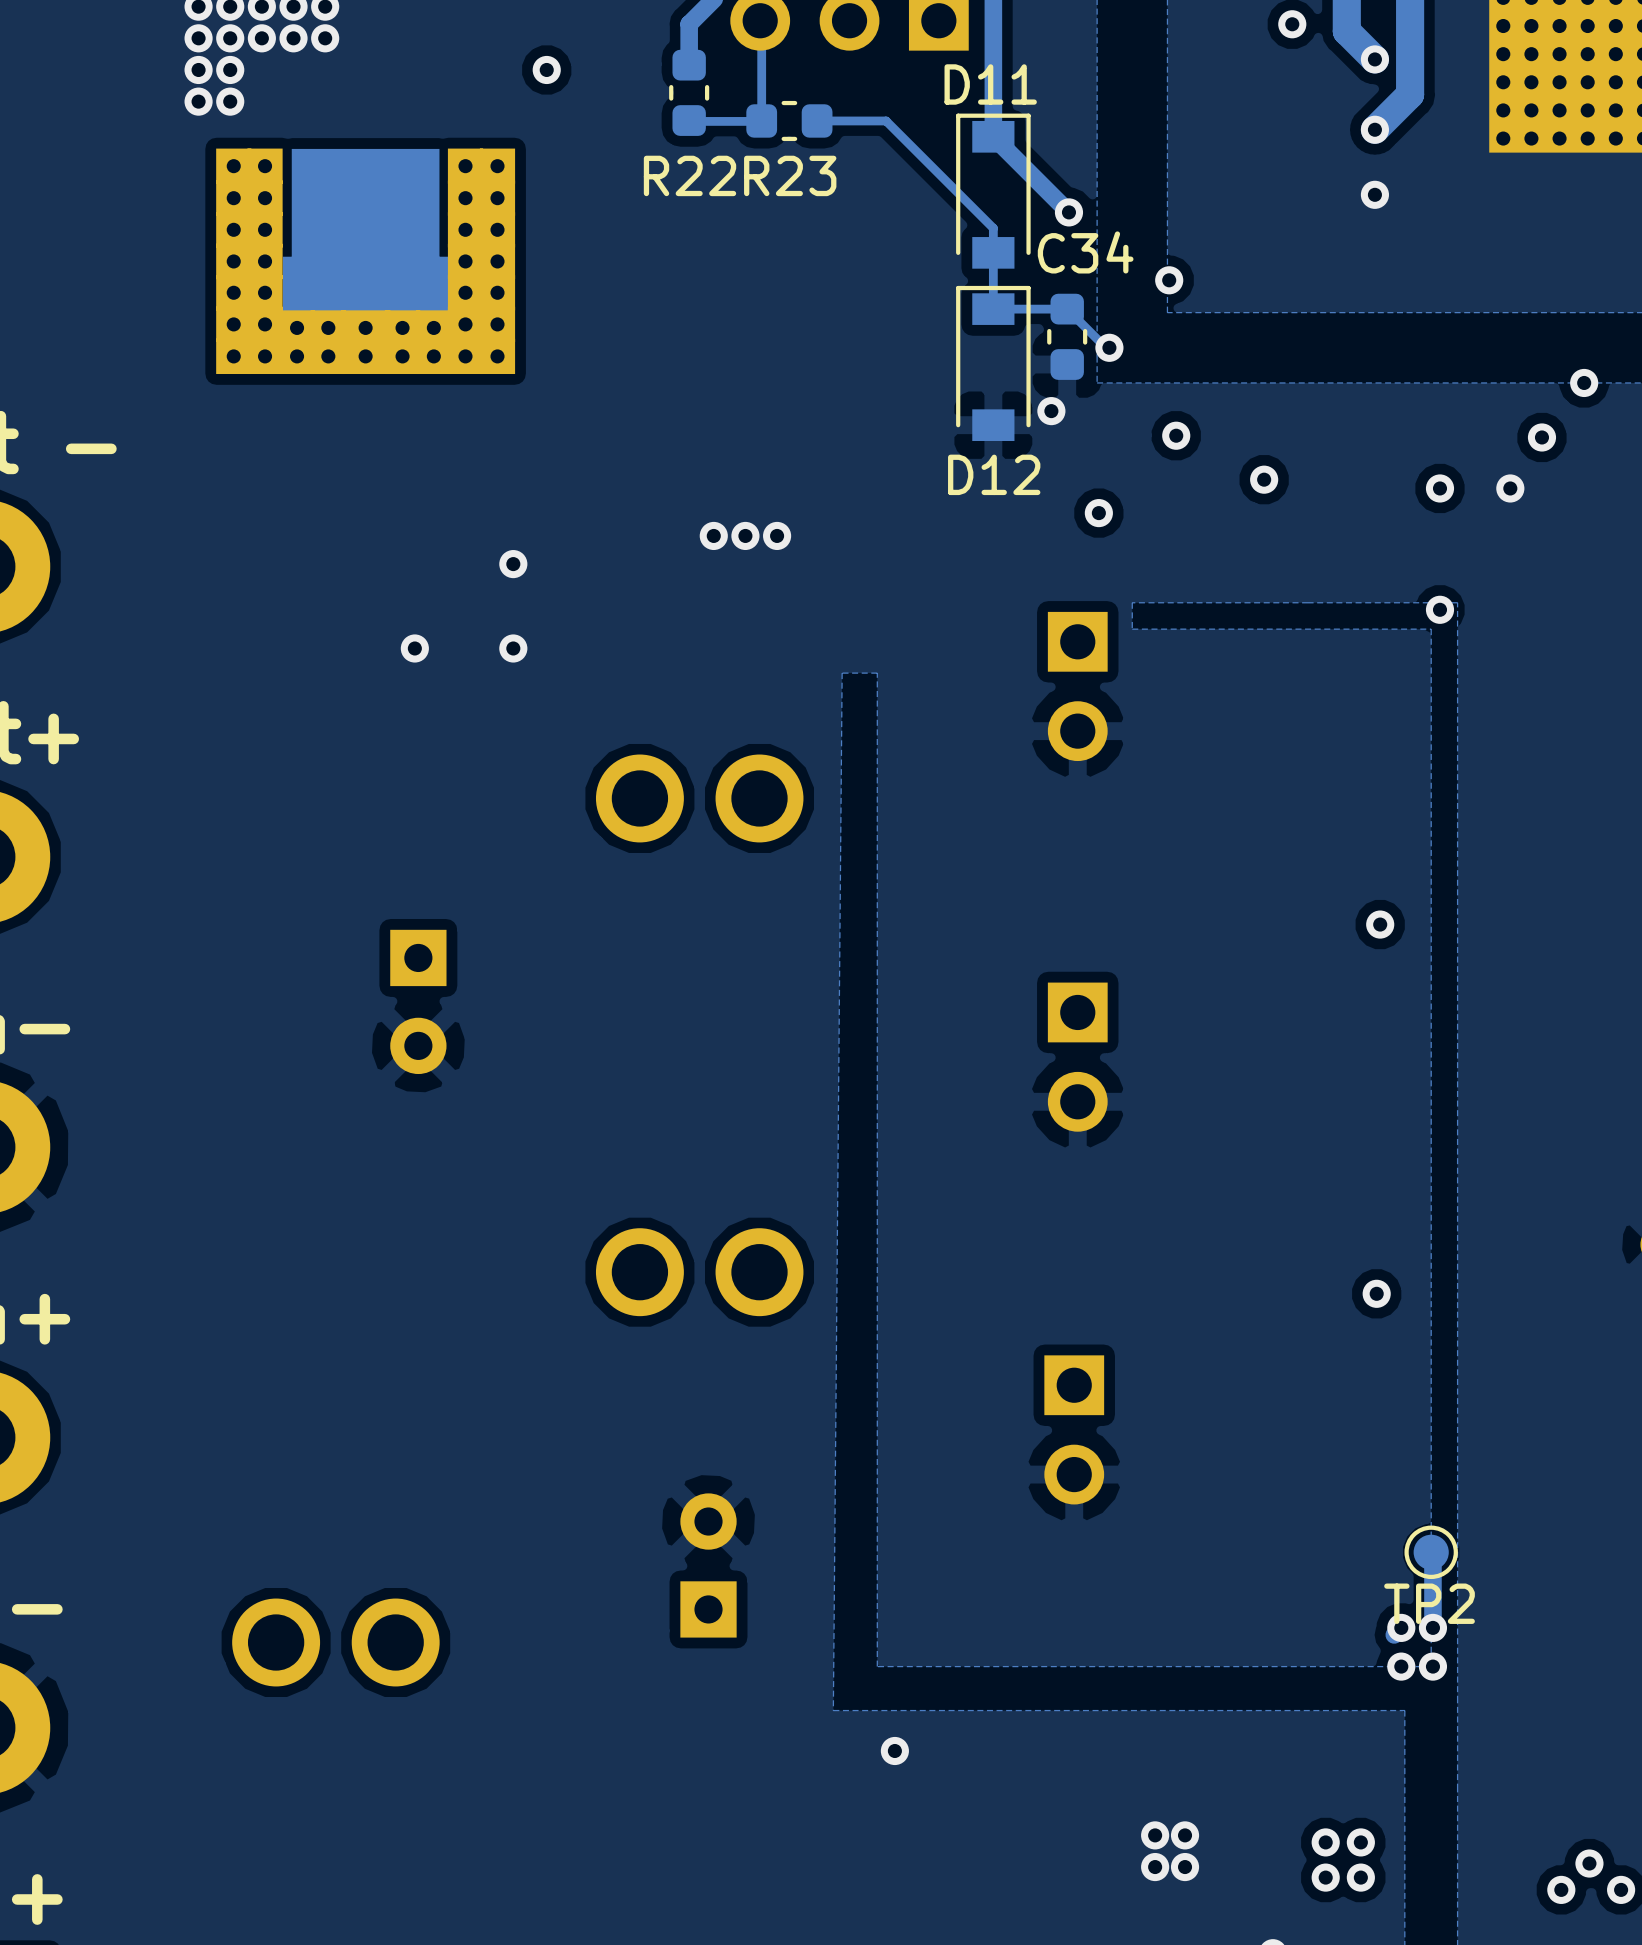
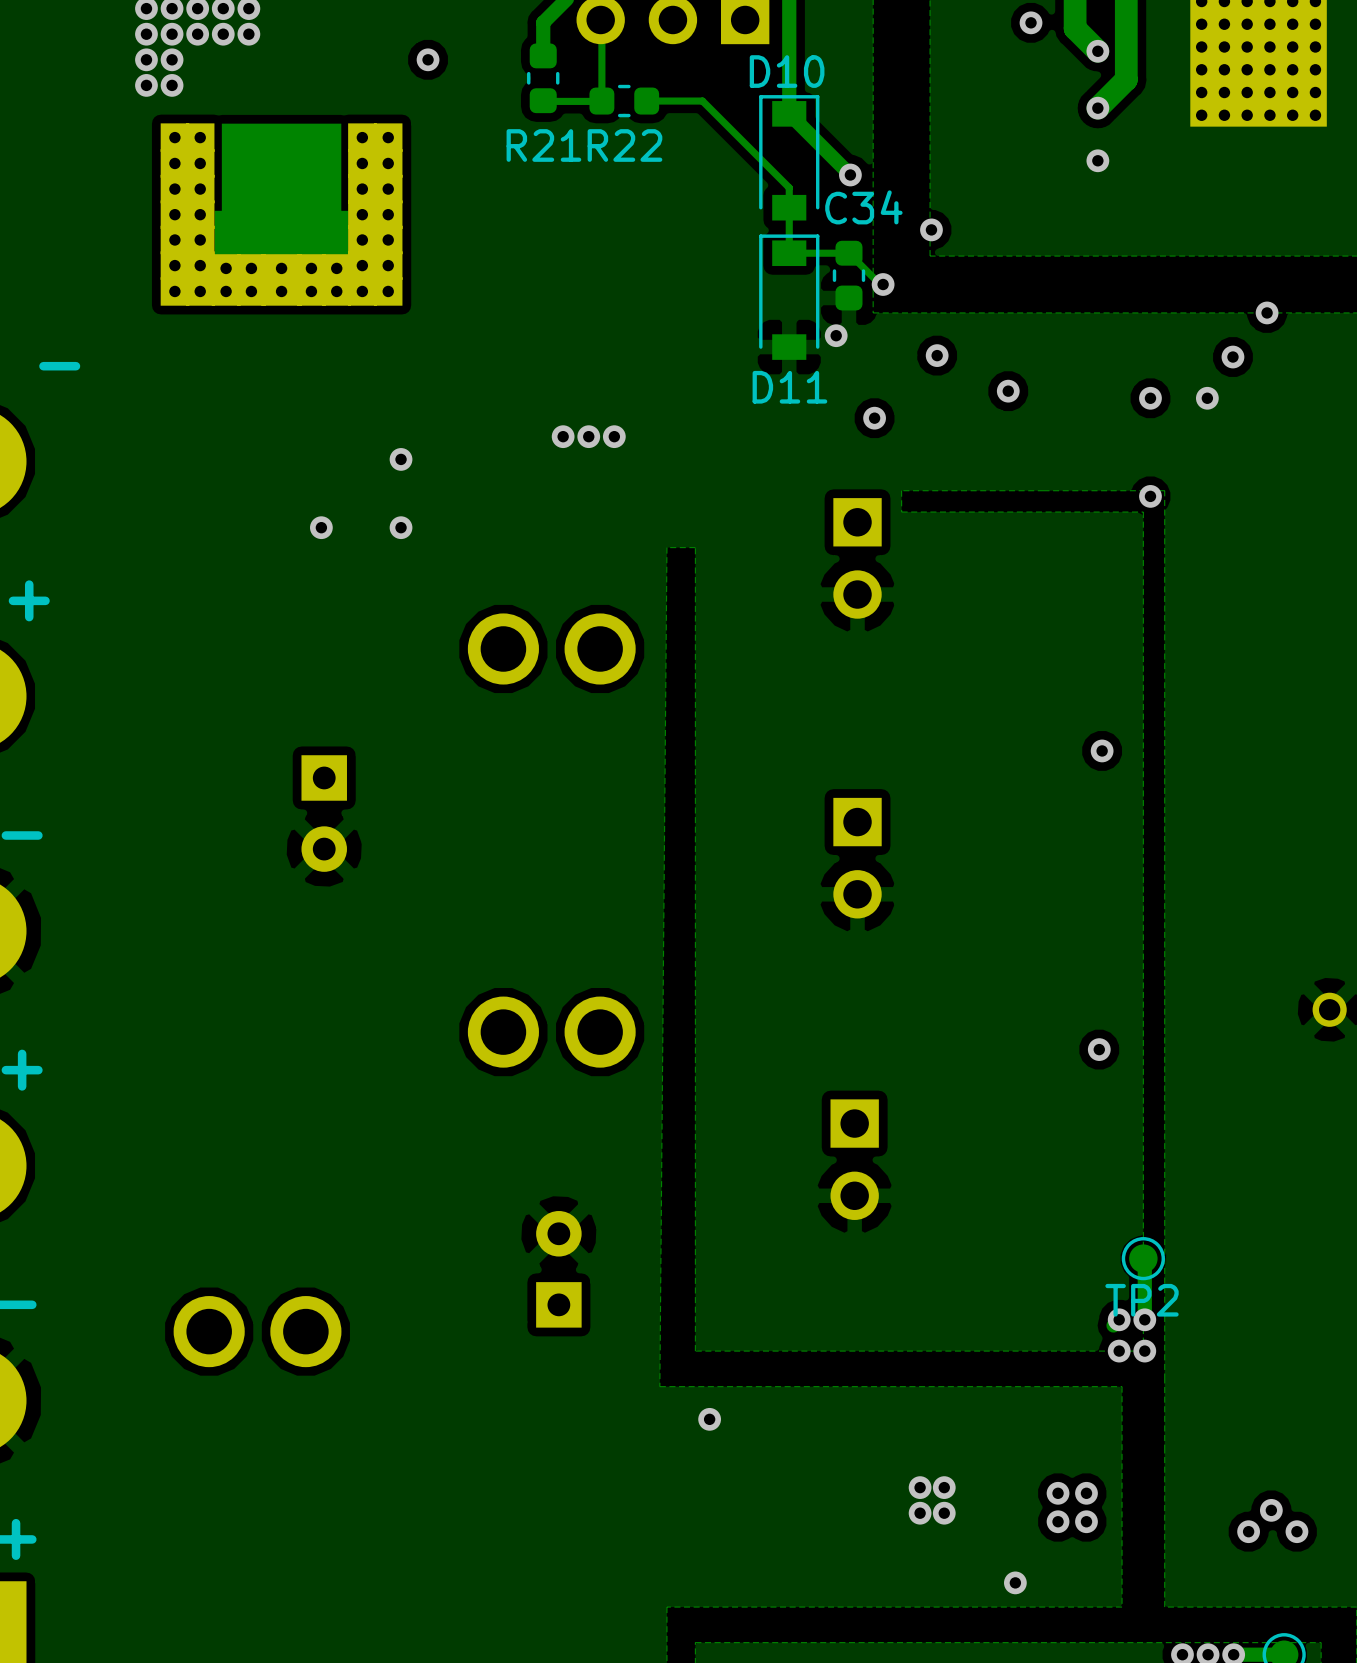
D11 name: D11 (990, 84) -> D10 (787, 71)
R22 name: R22 (690, 175) -> R21 (543, 145)
R23 name: R23 (790, 175) -> R22 (624, 145)
D12 name: D12 (994, 474) -> D11 (789, 387)

